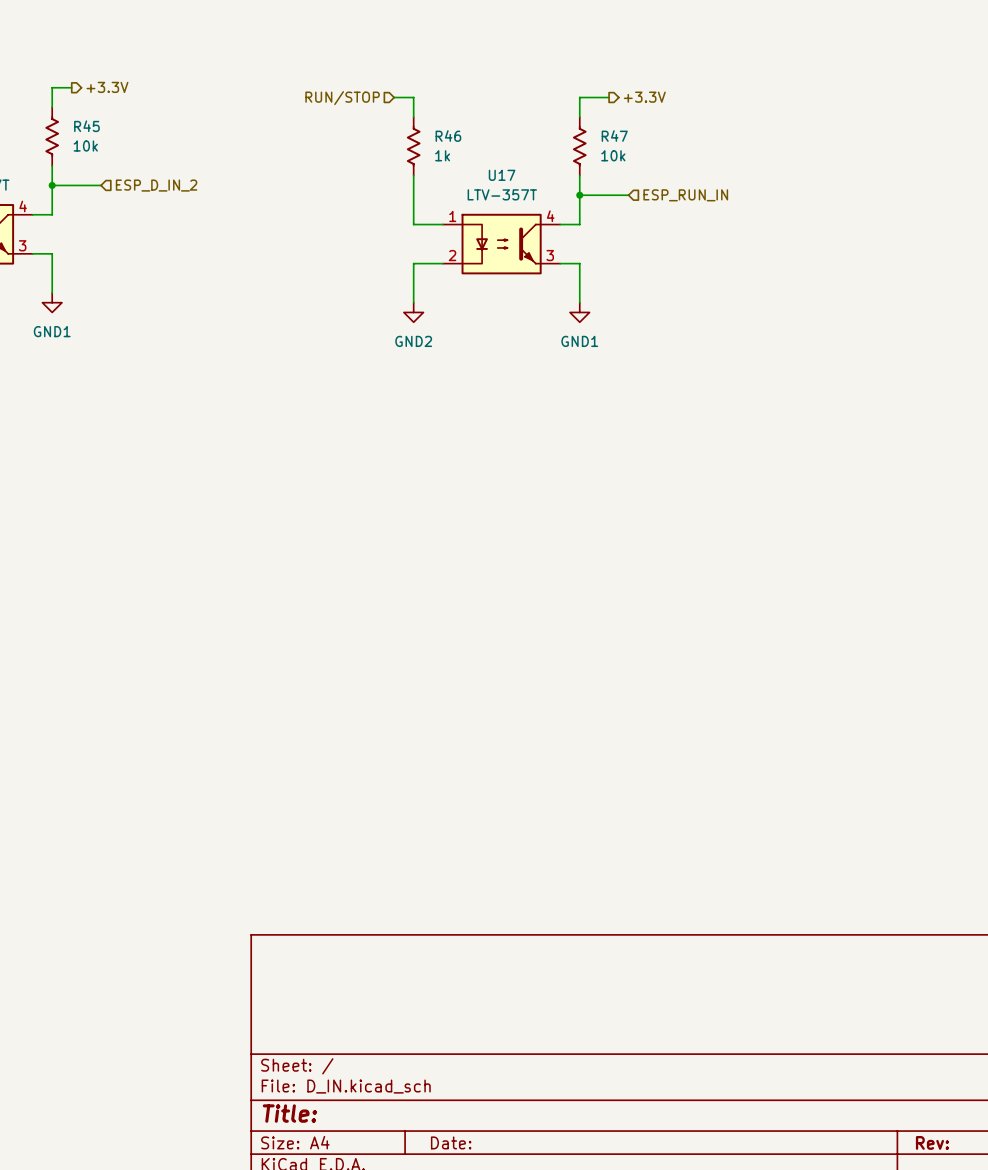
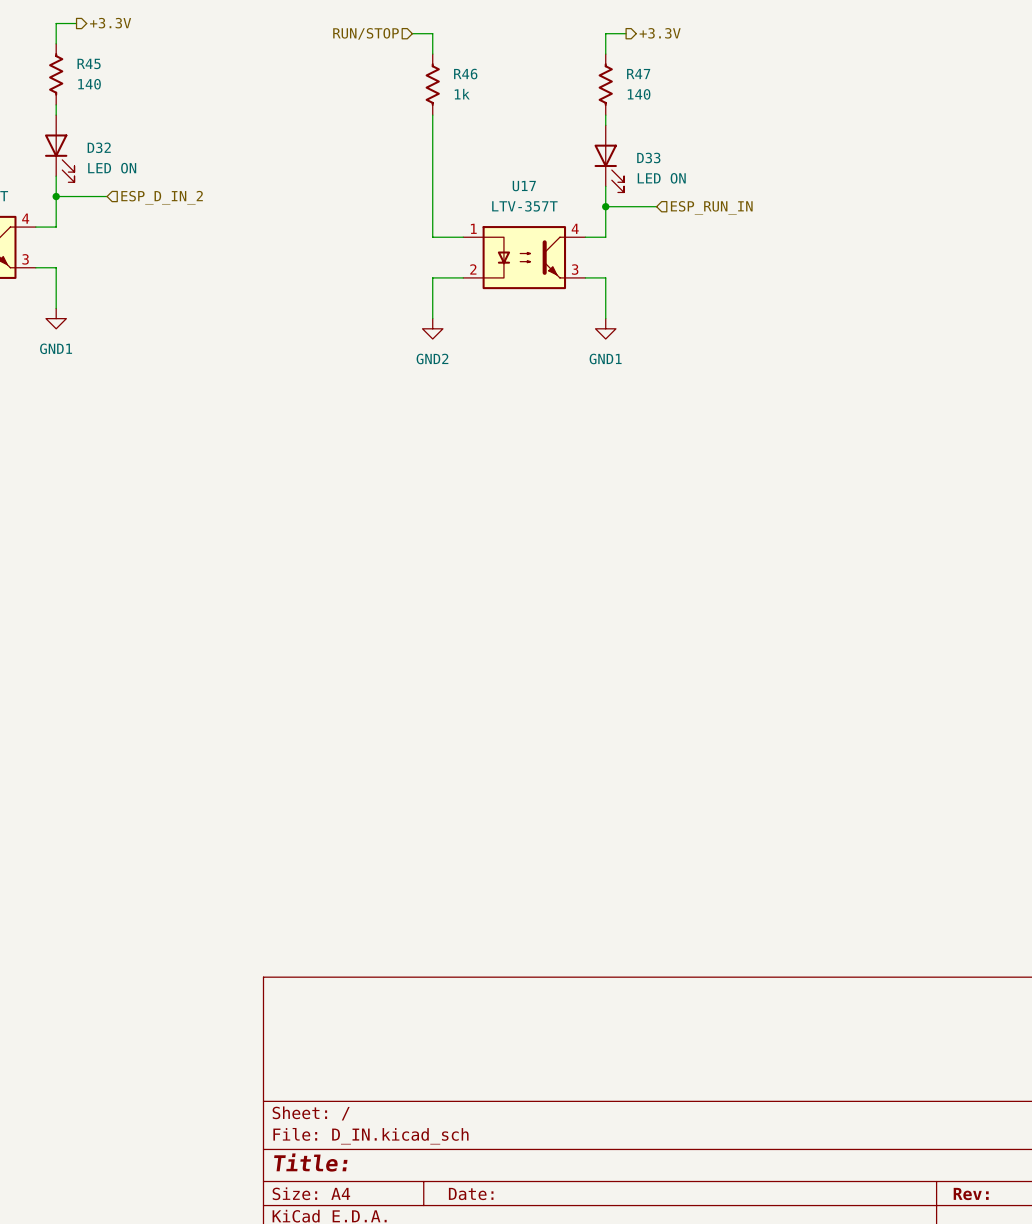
wire: none -> (76, 23) (56, 23) (56, 43)
wire: none -> (412, 33) (432, 33) (432, 54)
wire: none -> (626, 33) (605, 33) (605, 54)
wire: (71, 87) (52, 87) (52, 97) -> none
hierarchical label position: +3.3V (107, 87) -> +3.3V (110, 23)
wire: (394, 97) (413, 97) (413, 107) -> none
wire: (609, 97) (579, 97) (579, 107) -> none
hierarchical label position: +3.3V (644, 97) -> +3.3V (660, 33)
hierarchical label position: RUN/STOP (342, 98) -> RUN/STOP (366, 33)
R45 position: (52, 136) -> (56, 74)
D32: none -> LED ON (59, 148)
R45 value: 10k (85, 146) -> 140 (89, 84)
R46 position: (413, 146) -> (432, 84)
R47 position: (579, 146) -> (605, 84)
D33: none -> LED ON (609, 158)
R47 value: 10k (613, 155) -> 140 (639, 94)

